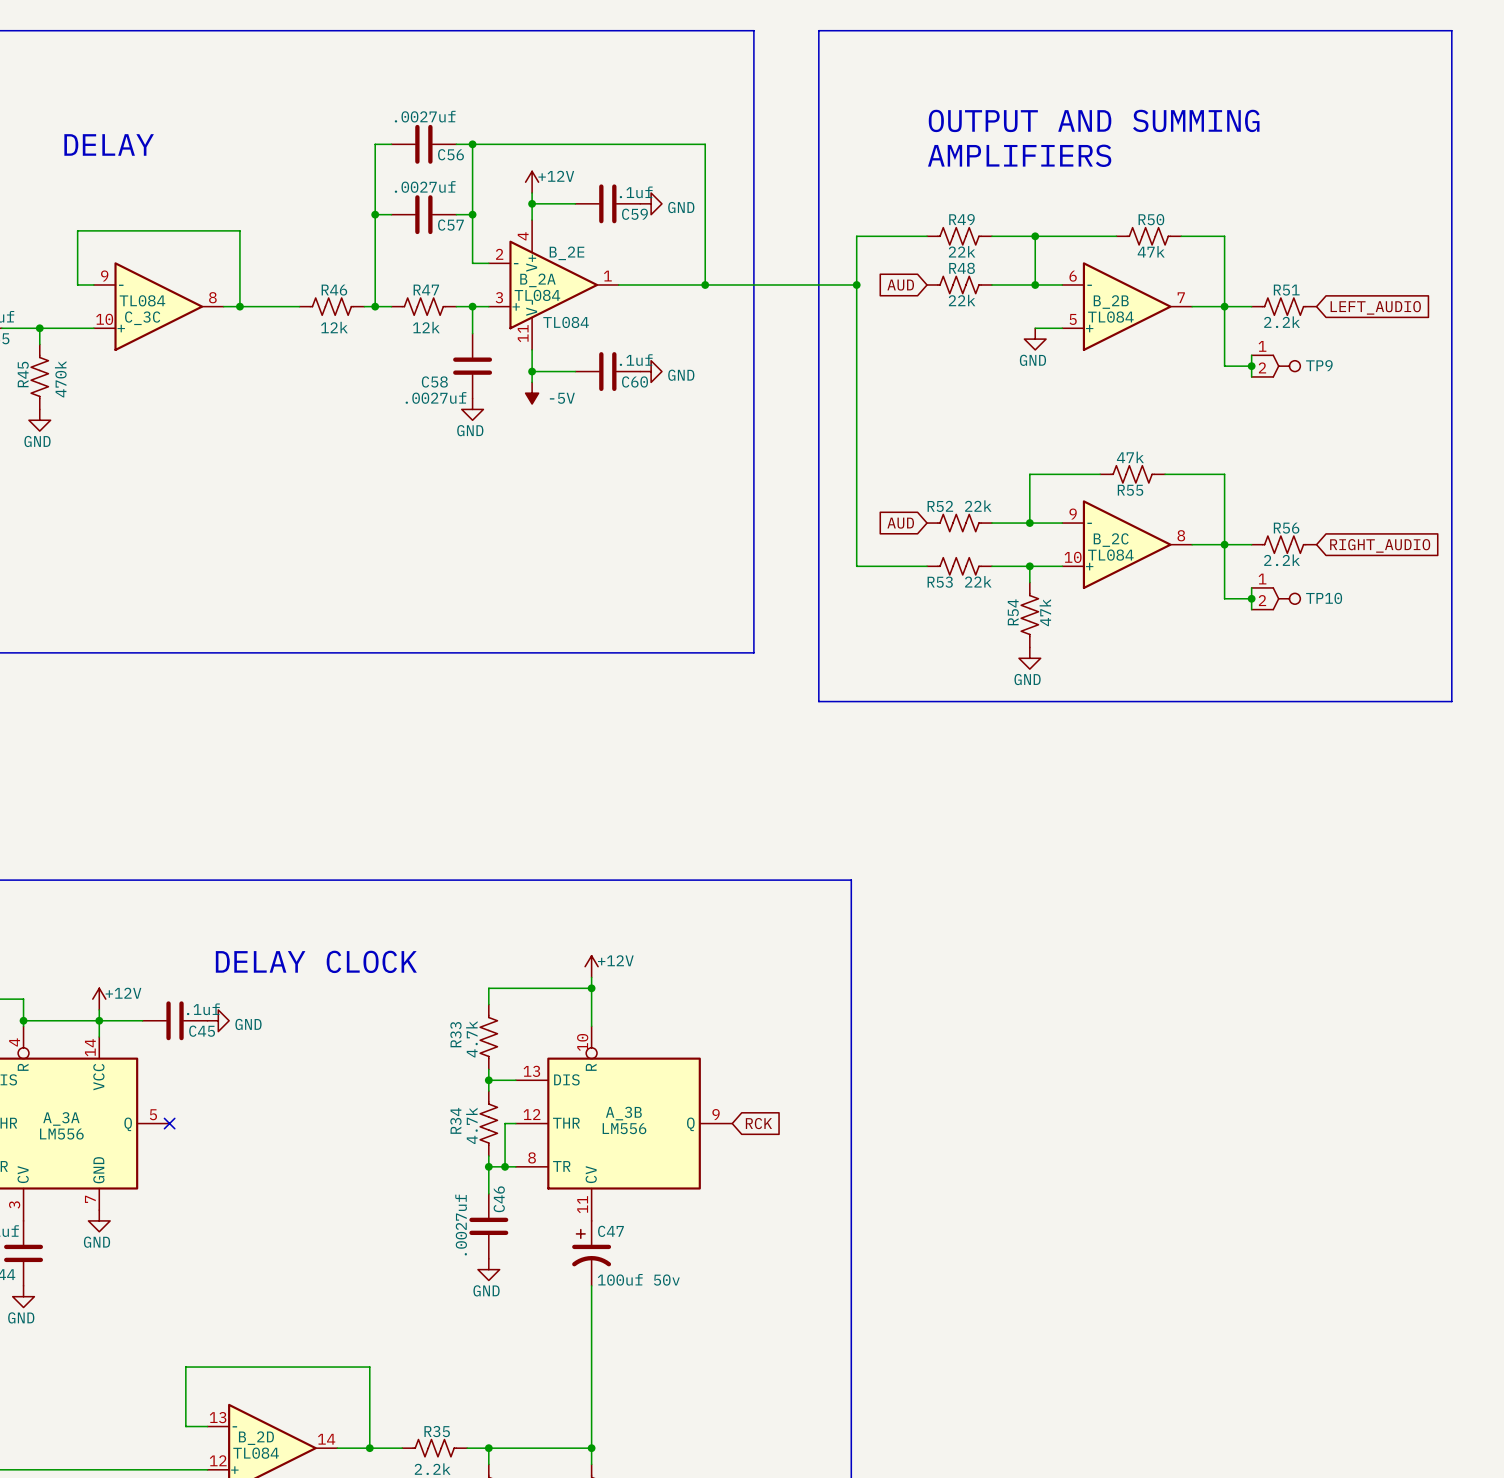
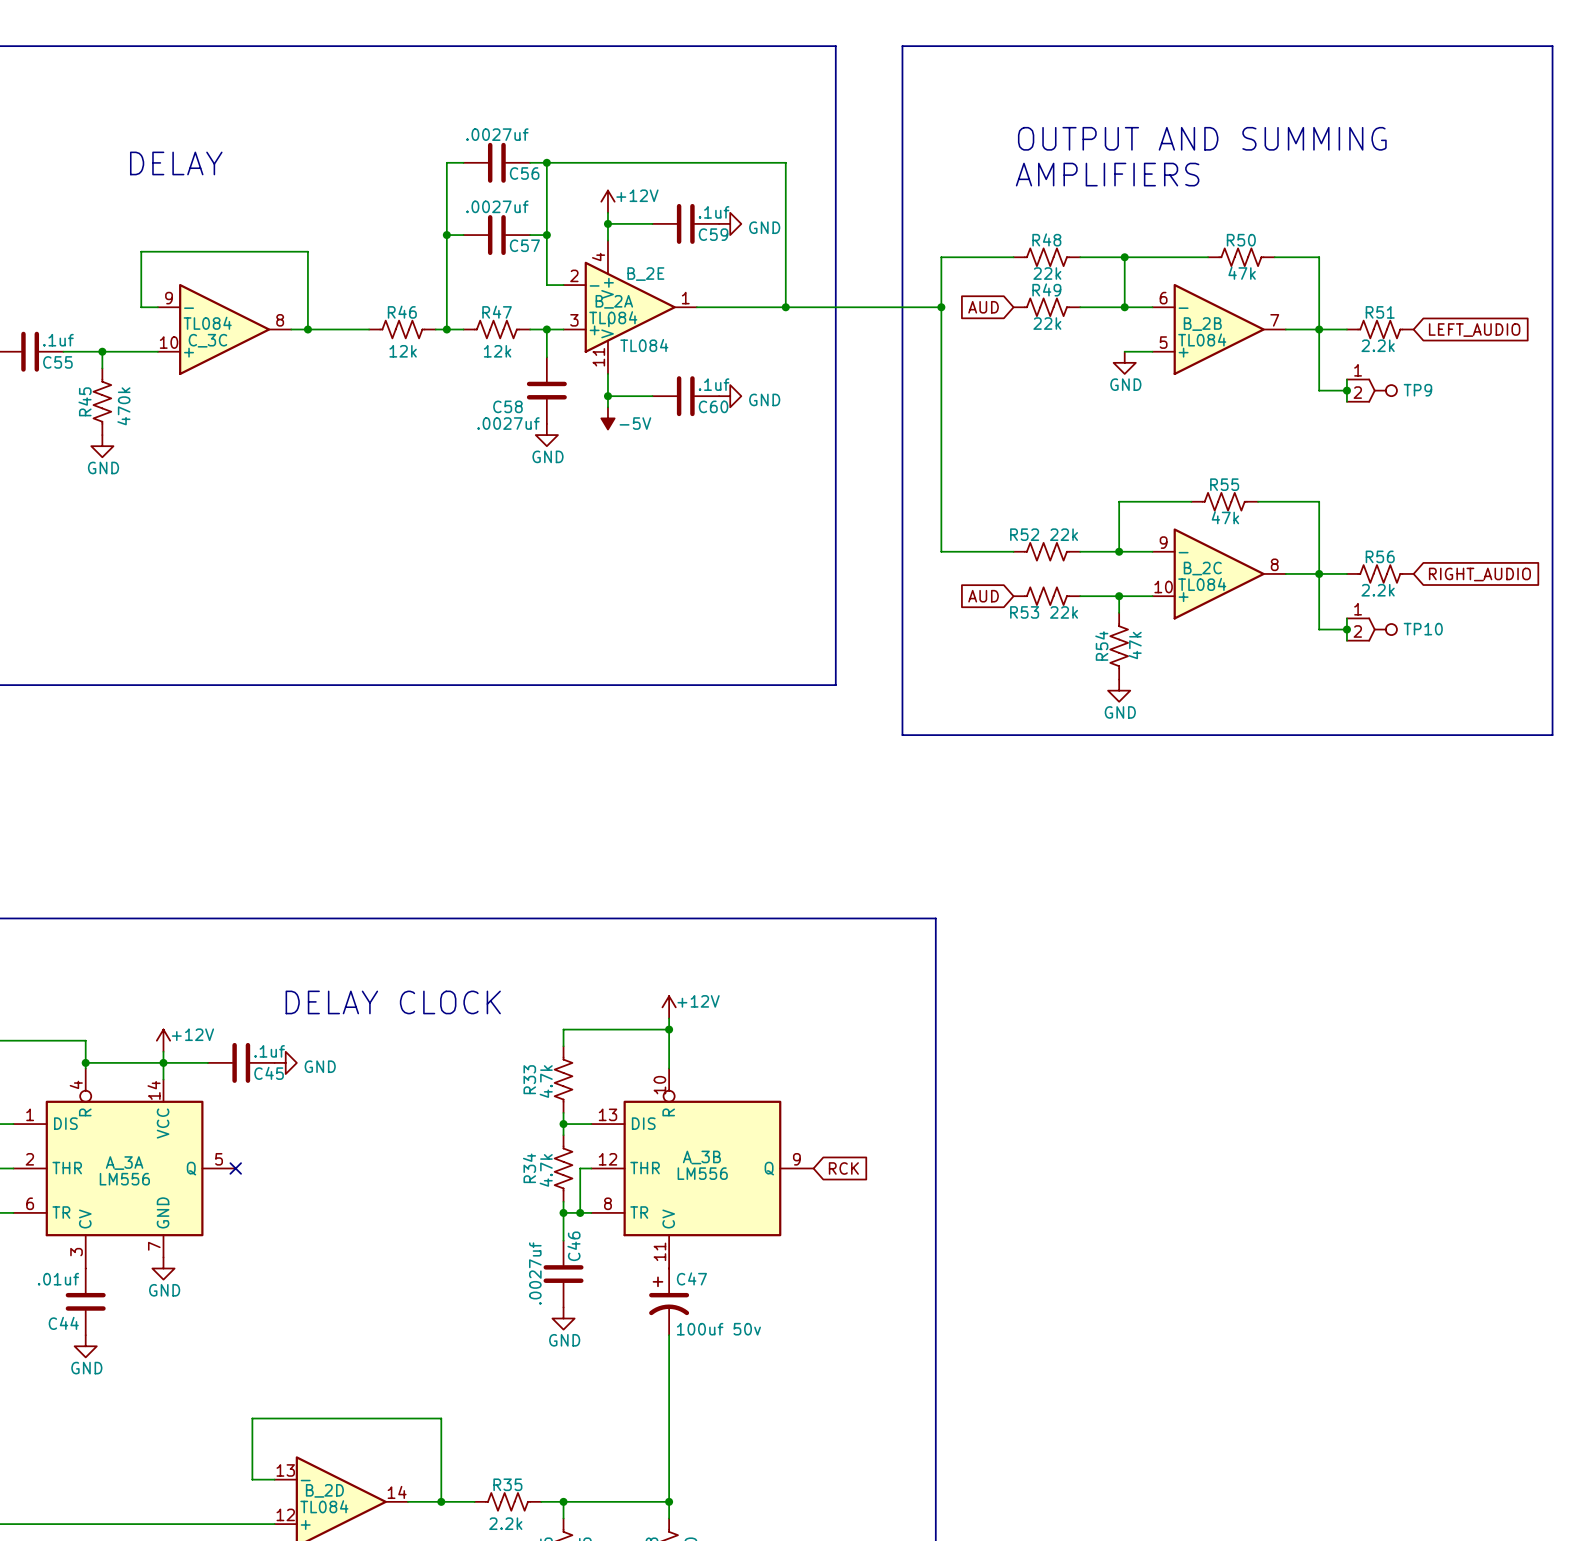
R49 name: R49 (961, 219) -> R48 (1046, 239)
R48 name: R48 (962, 268) -> R49 (1046, 289)
R55 value position: 47k (1130, 457) -> 47k (1225, 517)
R55 name position: R55 (1130, 490) -> R55 (1224, 484)
wire: (856, 523) (856, 566) (927, 566) -> (941, 551) (1013, 551)
global label position: AUD (900, 523) -> AUD (983, 596)

